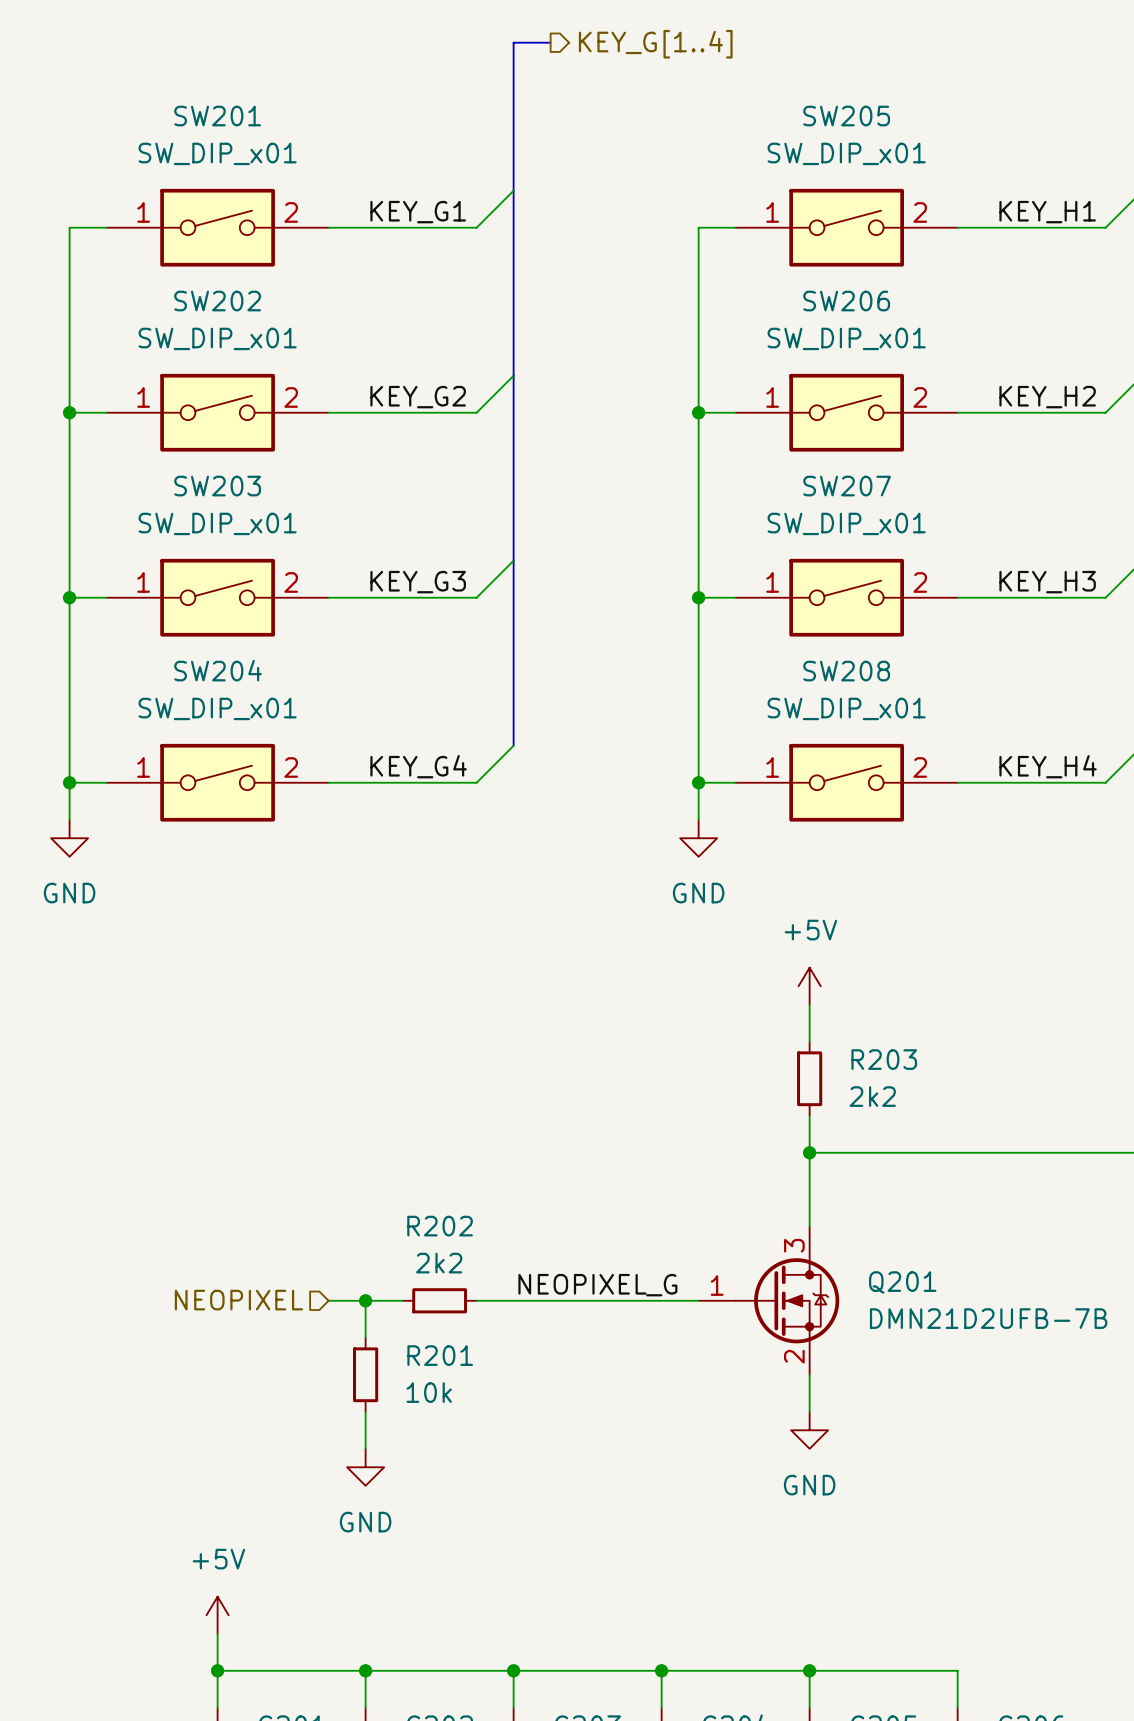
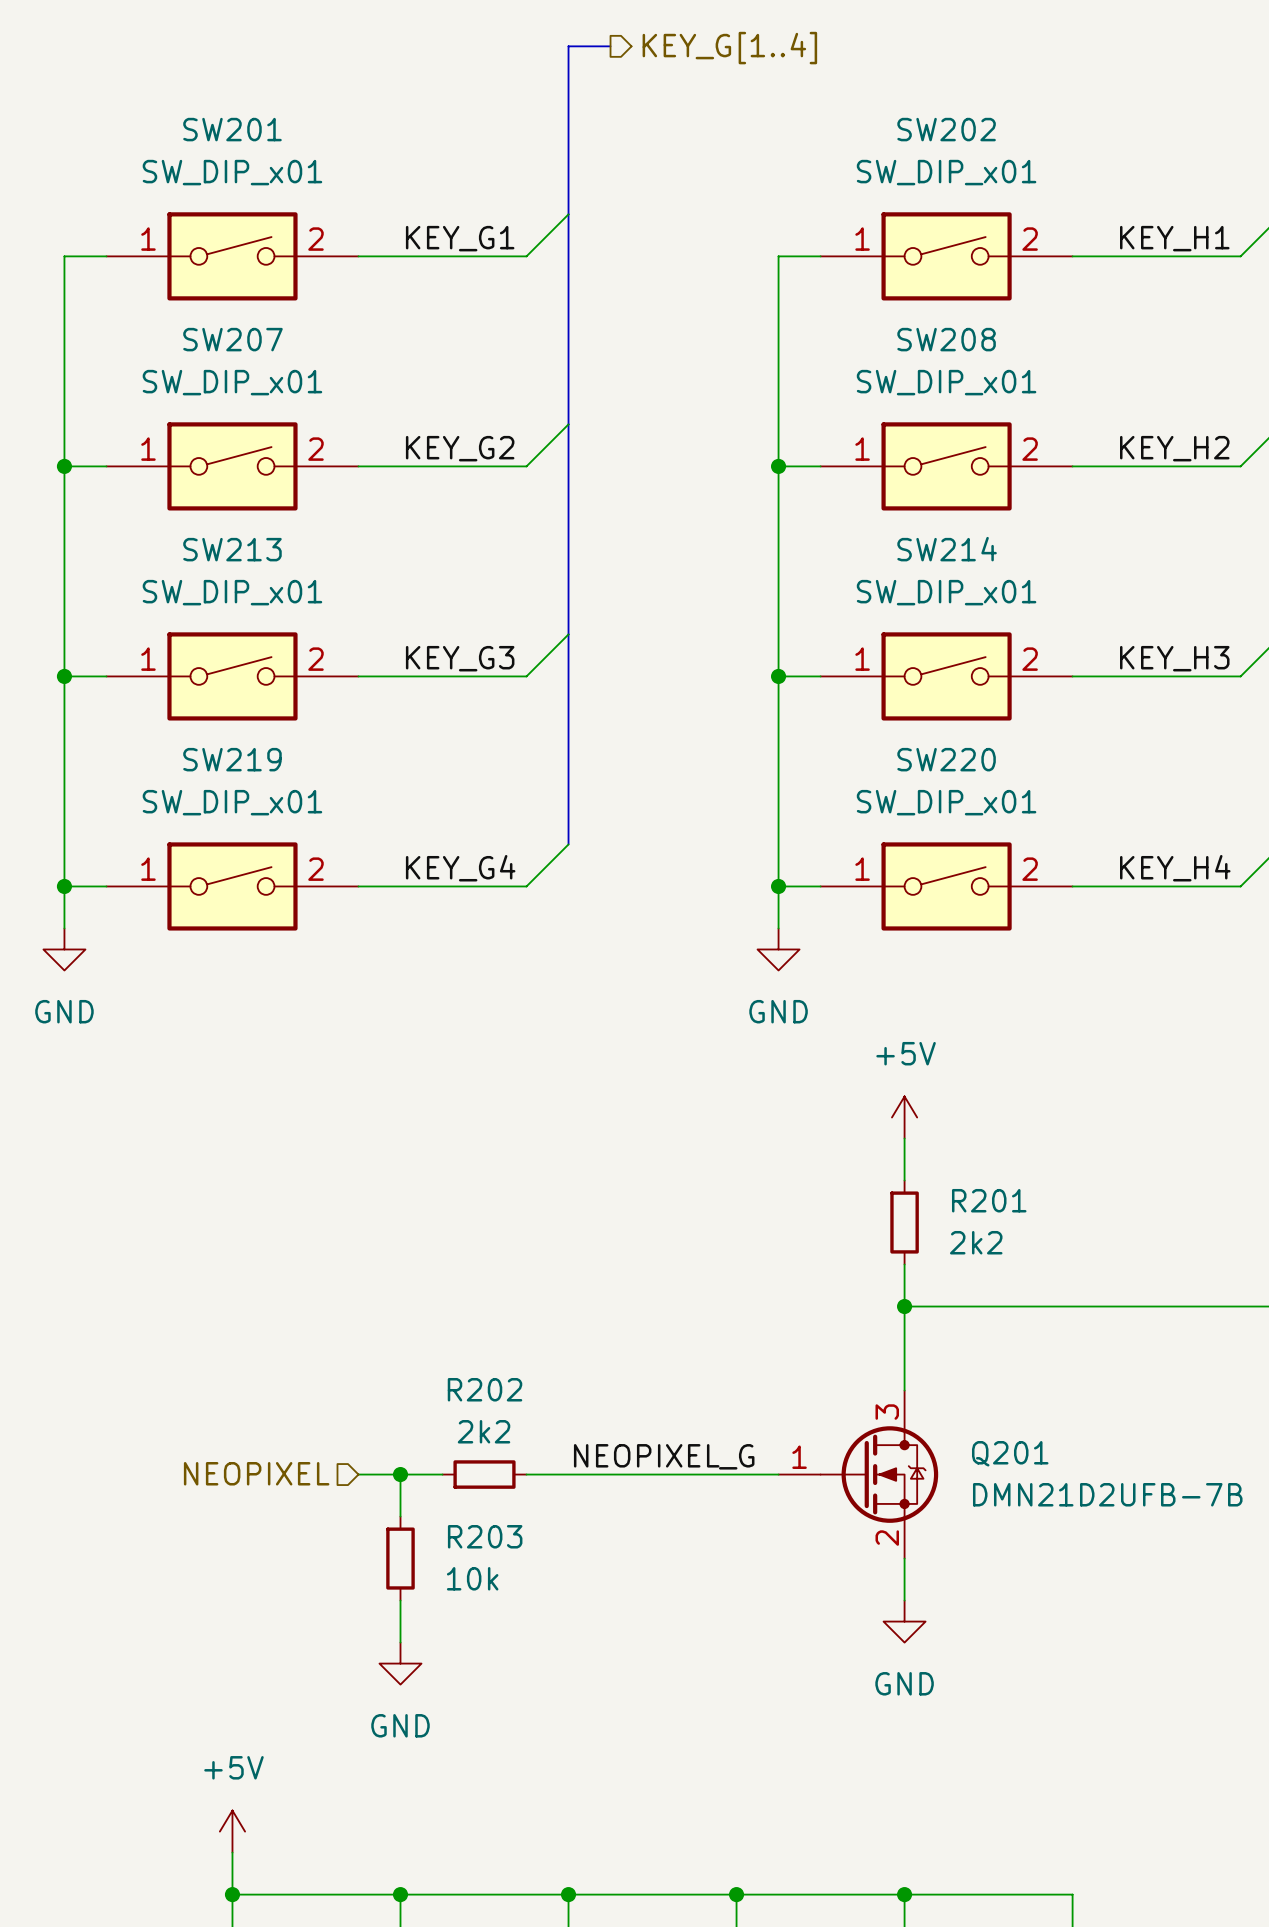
SW205 name: SW205 (846, 116) -> SW202 (946, 129)
SW202 name: SW202 (217, 301) -> SW207 (232, 339)
SW206 name: SW206 (846, 301) -> SW208 (946, 339)
SW203 name: SW203 (217, 486) -> SW213 (232, 549)
SW207 name: SW207 (847, 486) -> SW214 (947, 549)
SW204 name: SW204 (218, 670) -> SW219 (232, 759)
SW208 name: SW208 (846, 671) -> SW220 (946, 759)
R203 name: R203 (884, 1059) -> R201 (989, 1200)
R201 name: R201 (440, 1355) -> R203 (485, 1536)

